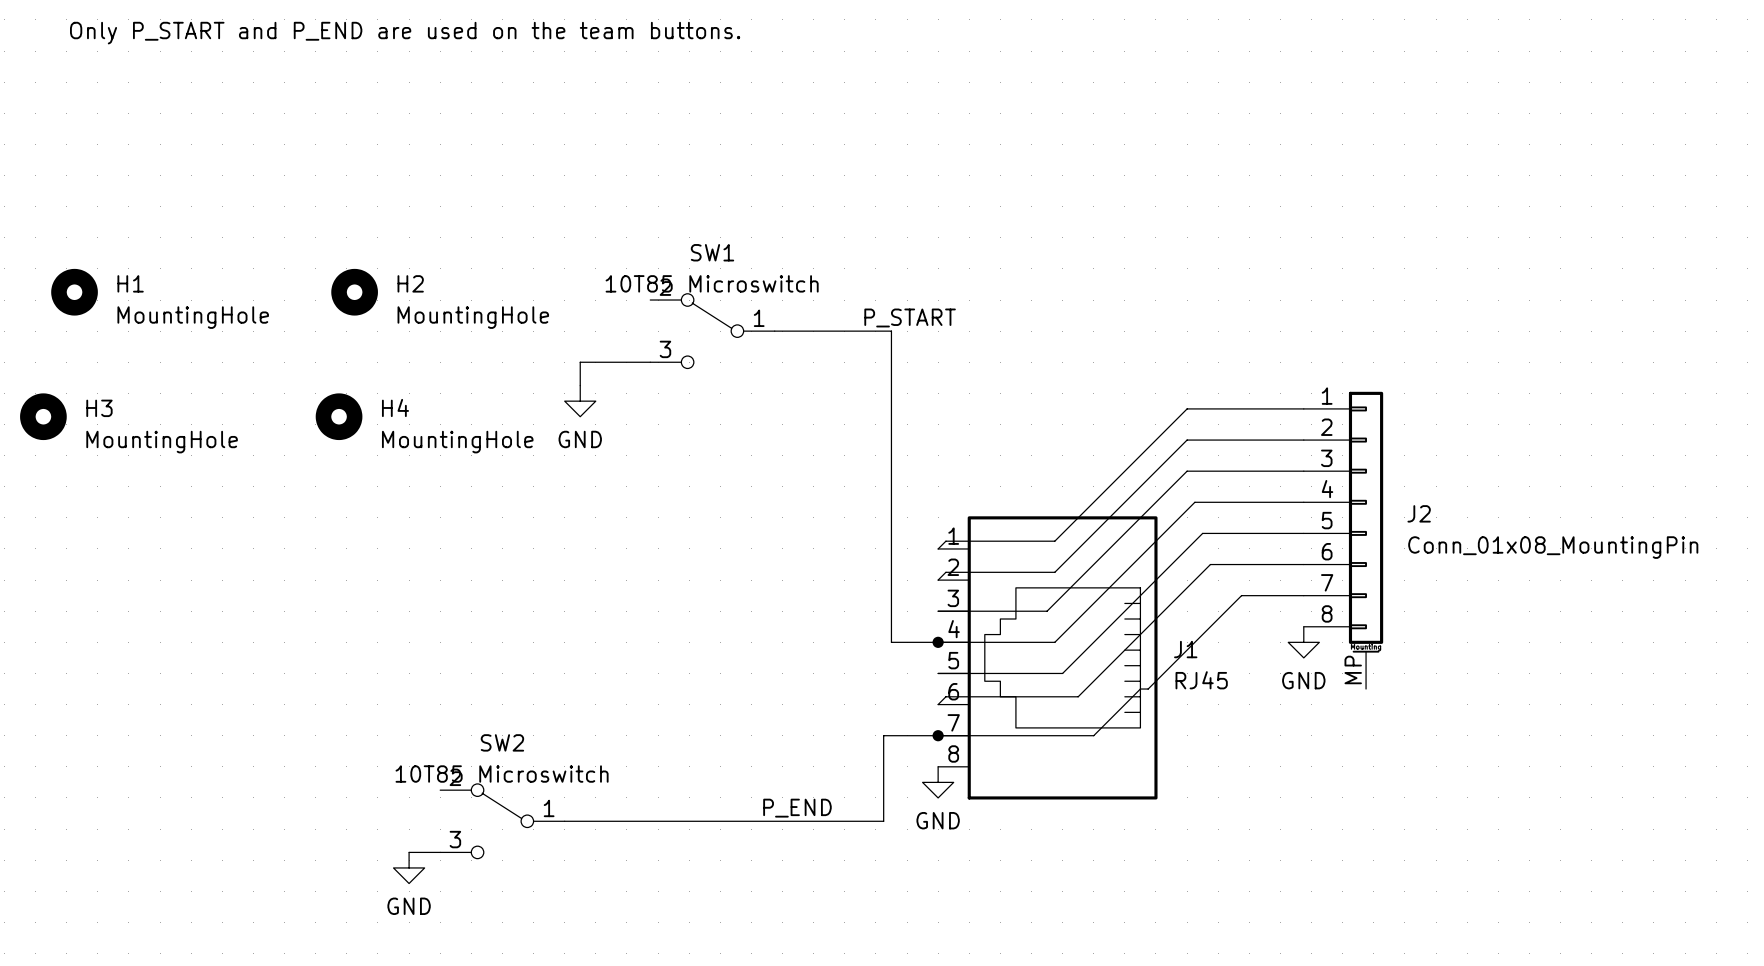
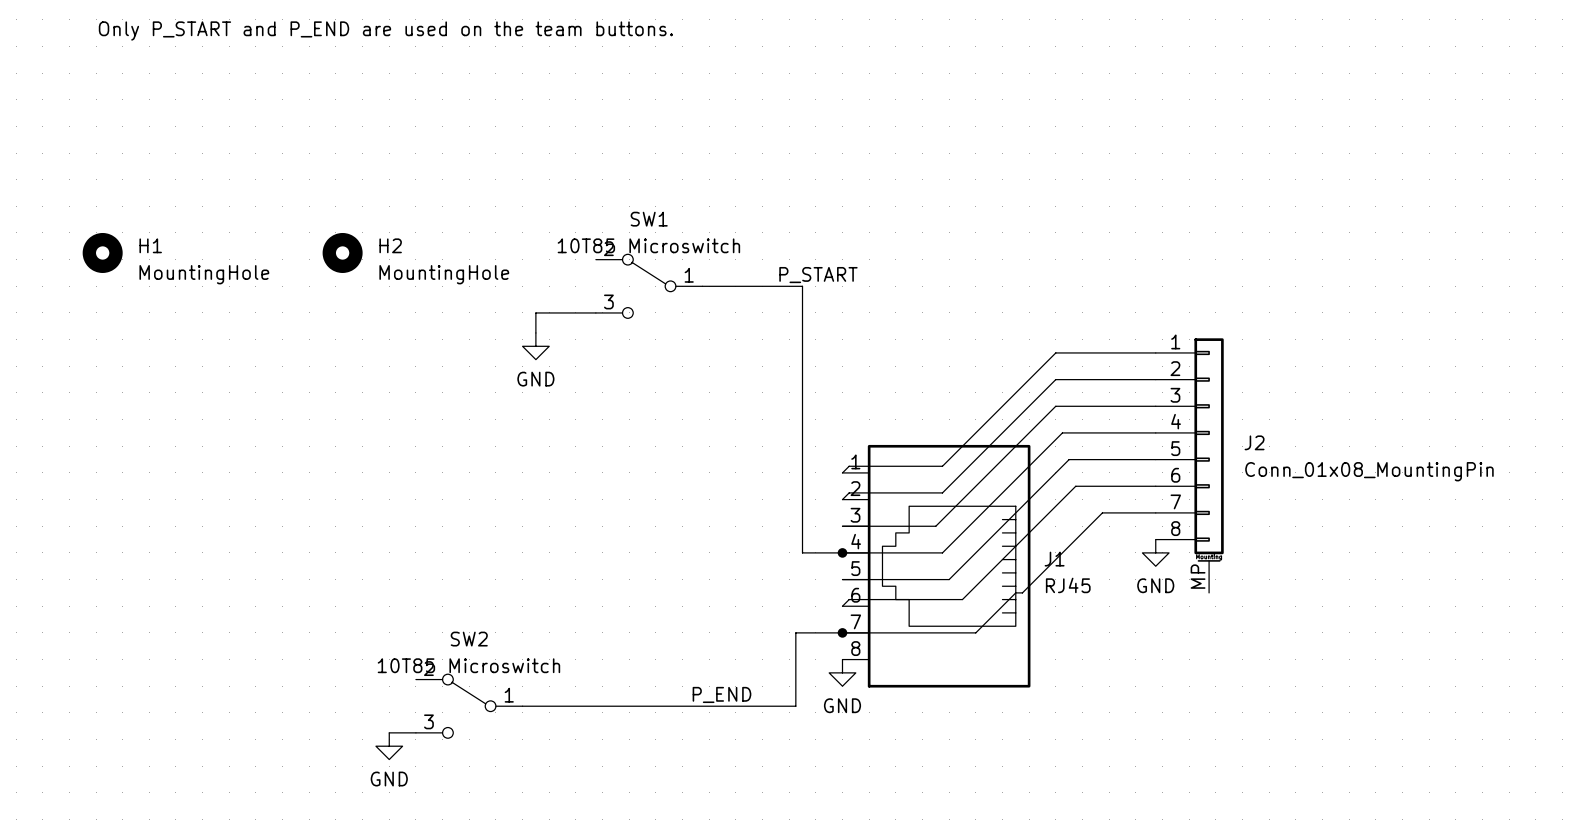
H3: MountingHole (43, 416) -> none
H4: MountingHole (339, 416) -> none

